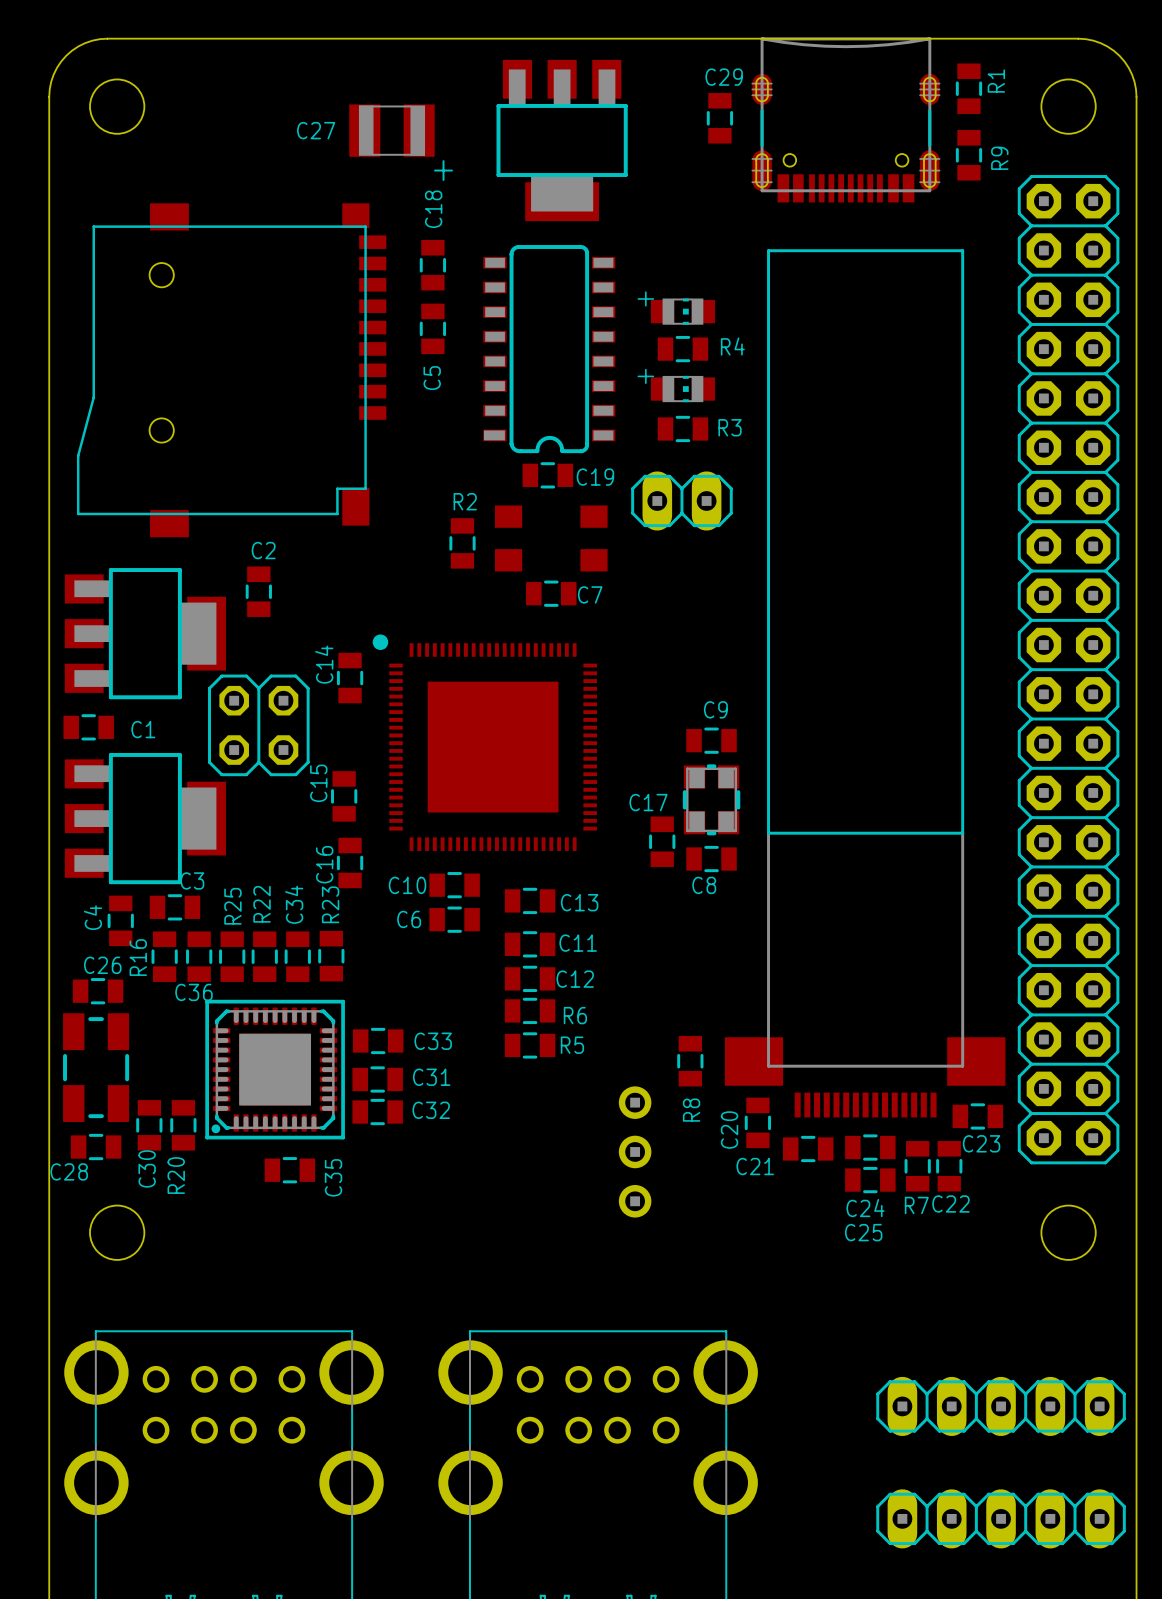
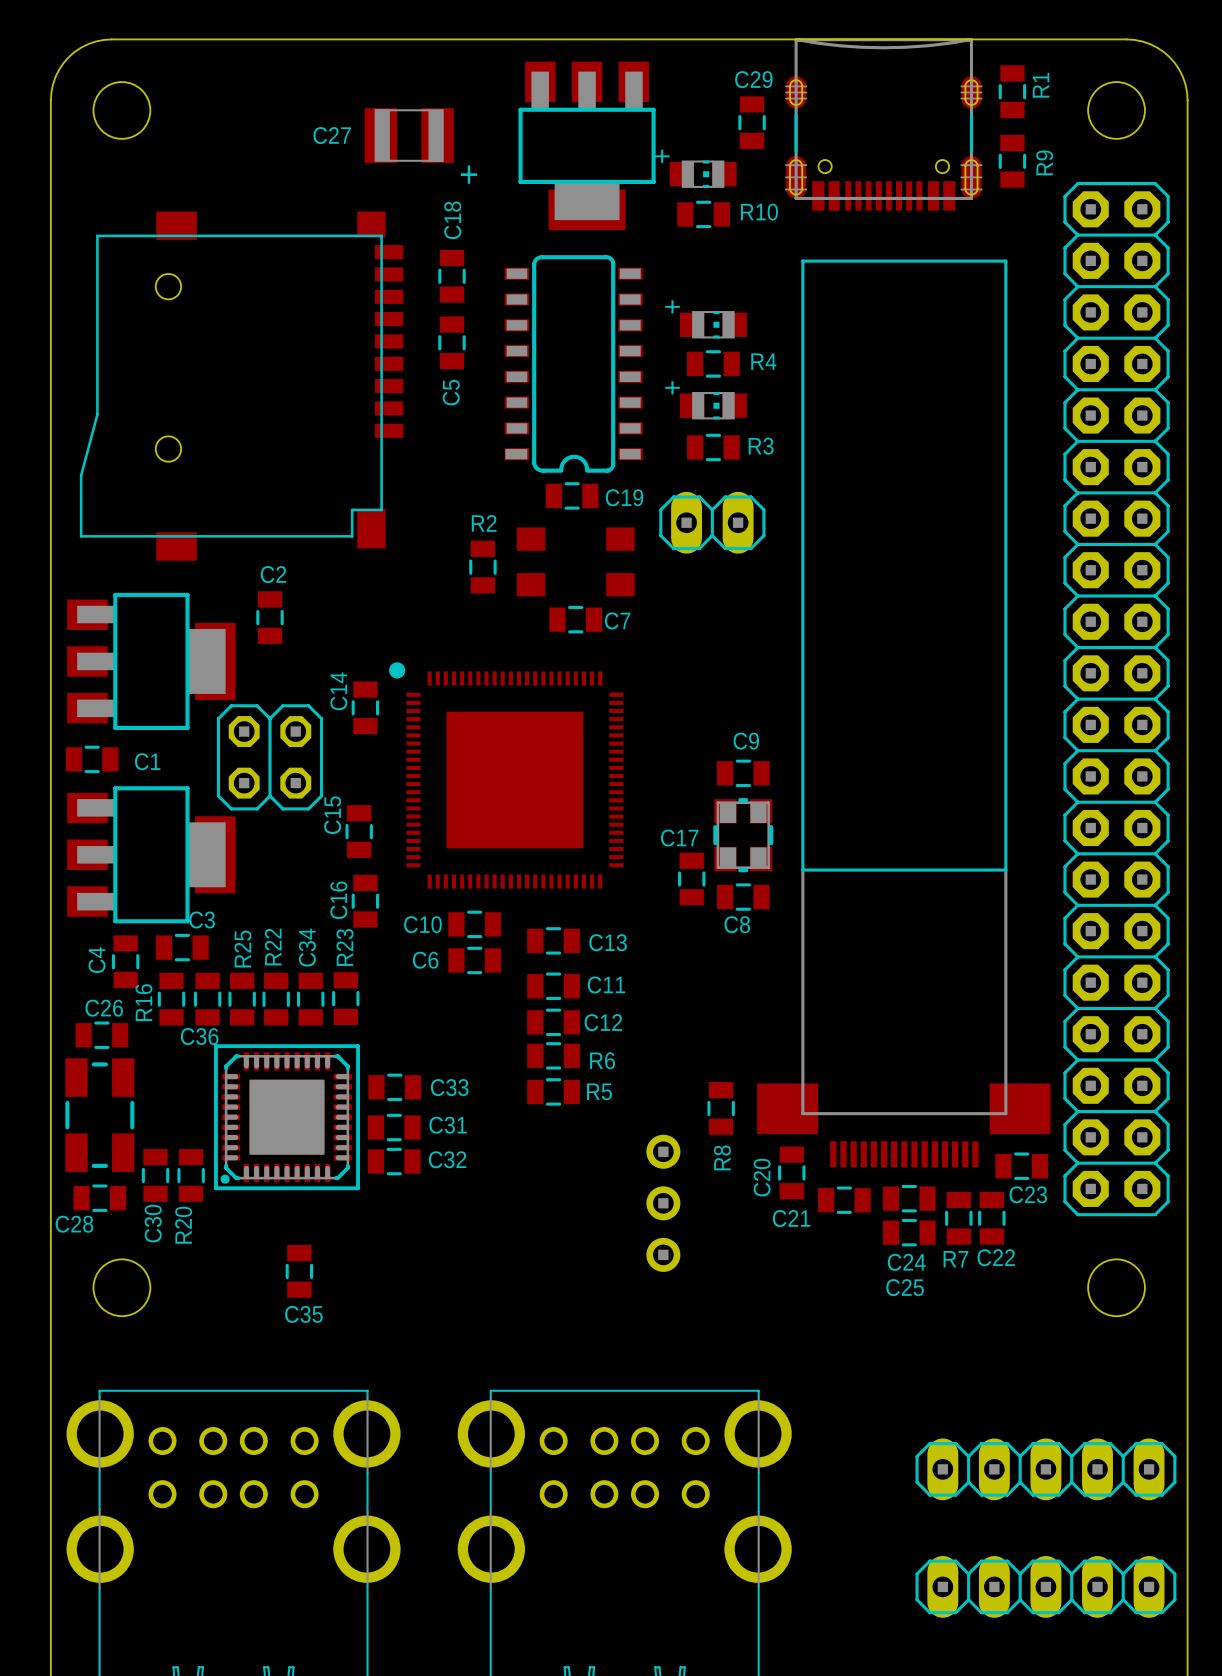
part: none -> (703, 174)
R10: none -> (703, 214)
C35 rotation: 0° (289, 1170) -> 90° clockwise (299, 1271)
C35 position: (289, 1170) -> (299, 1271)

